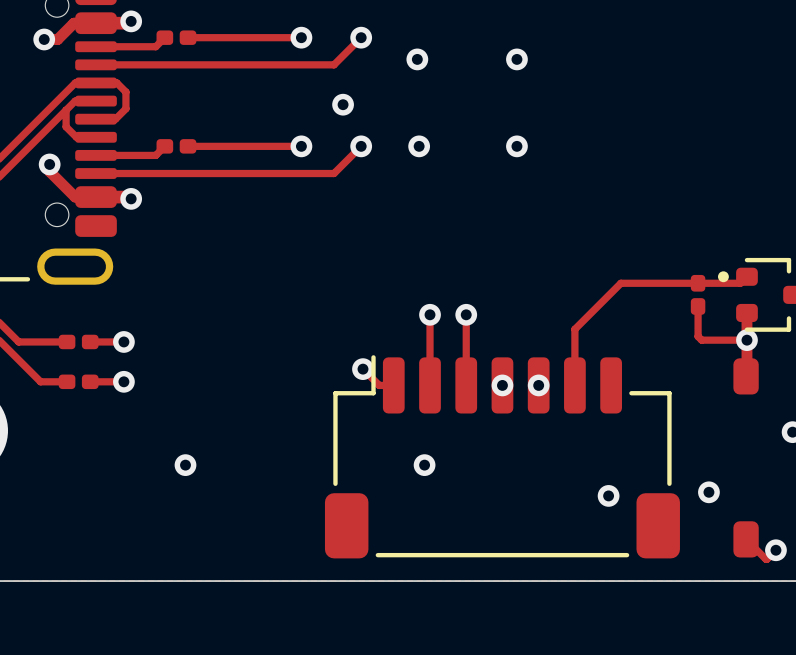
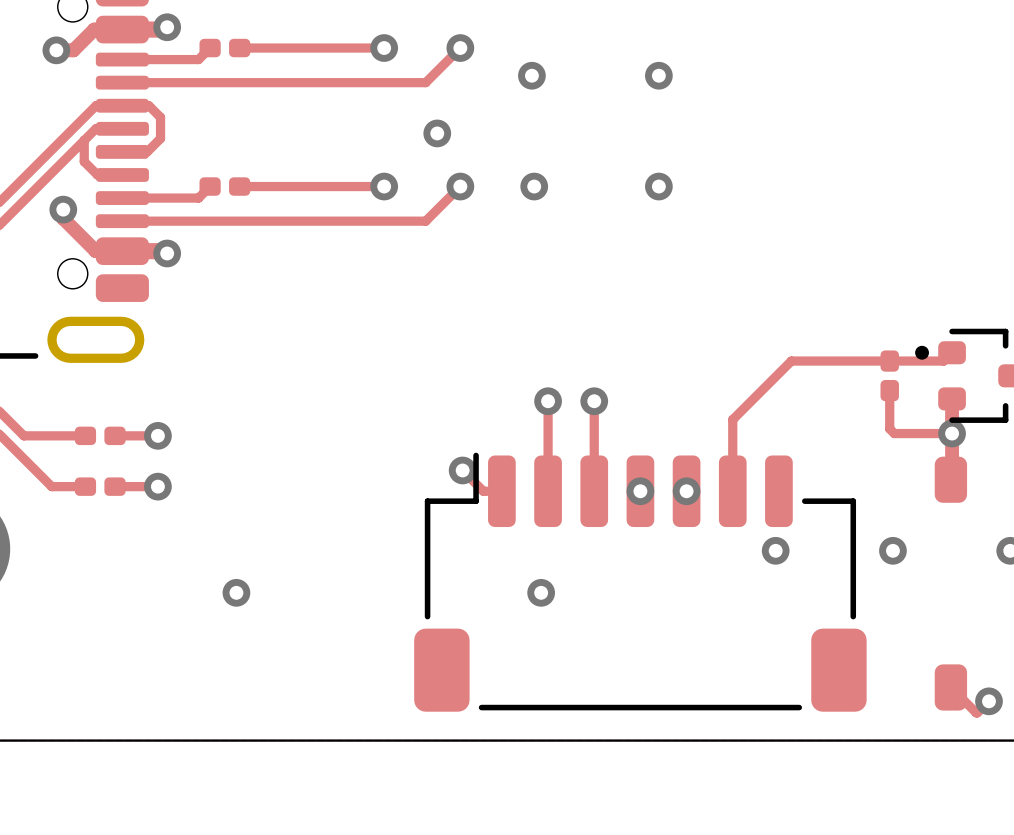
via: none -> (775, 550)
via: none -> (892, 550)
via: (708, 492) -> none
via: (608, 495) -> none

